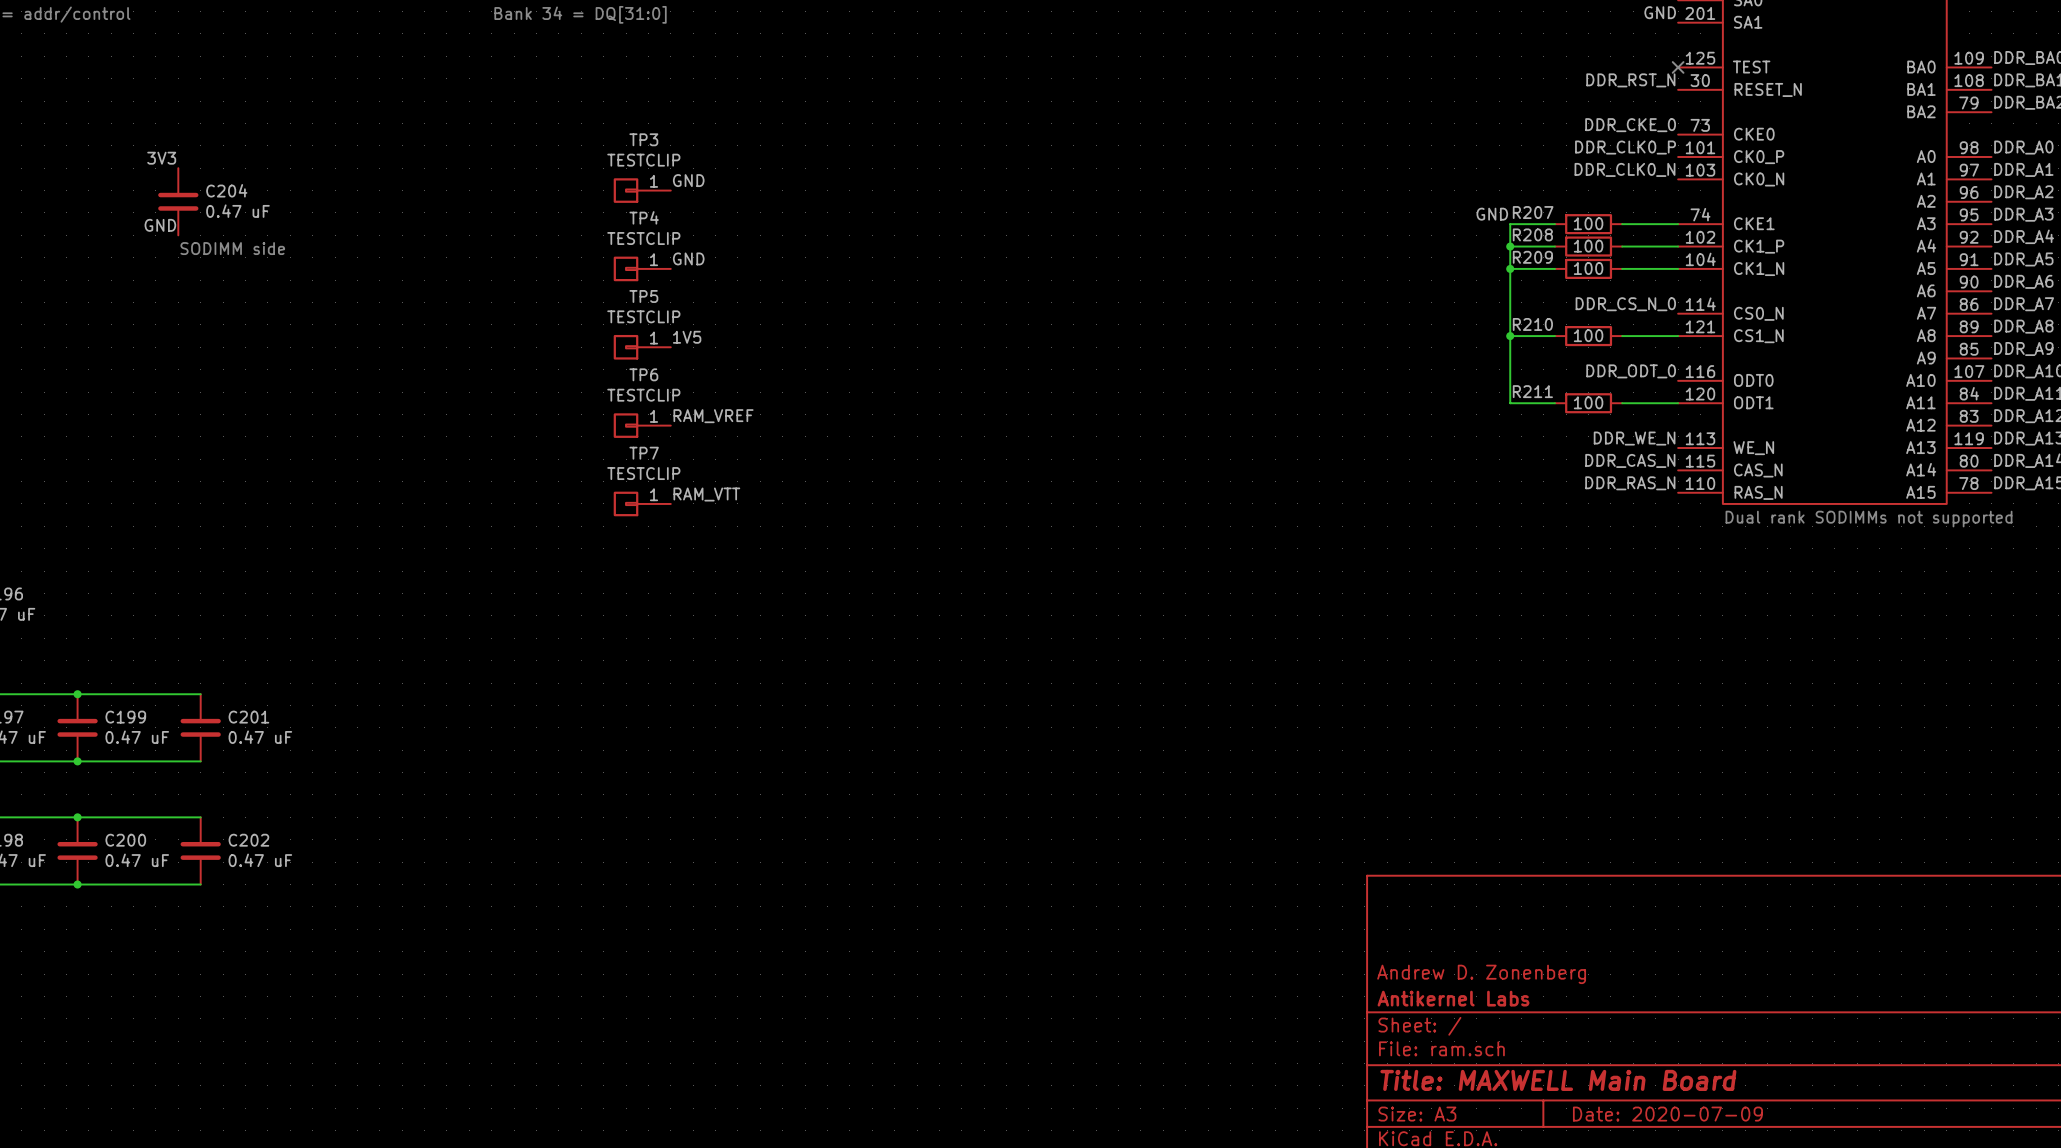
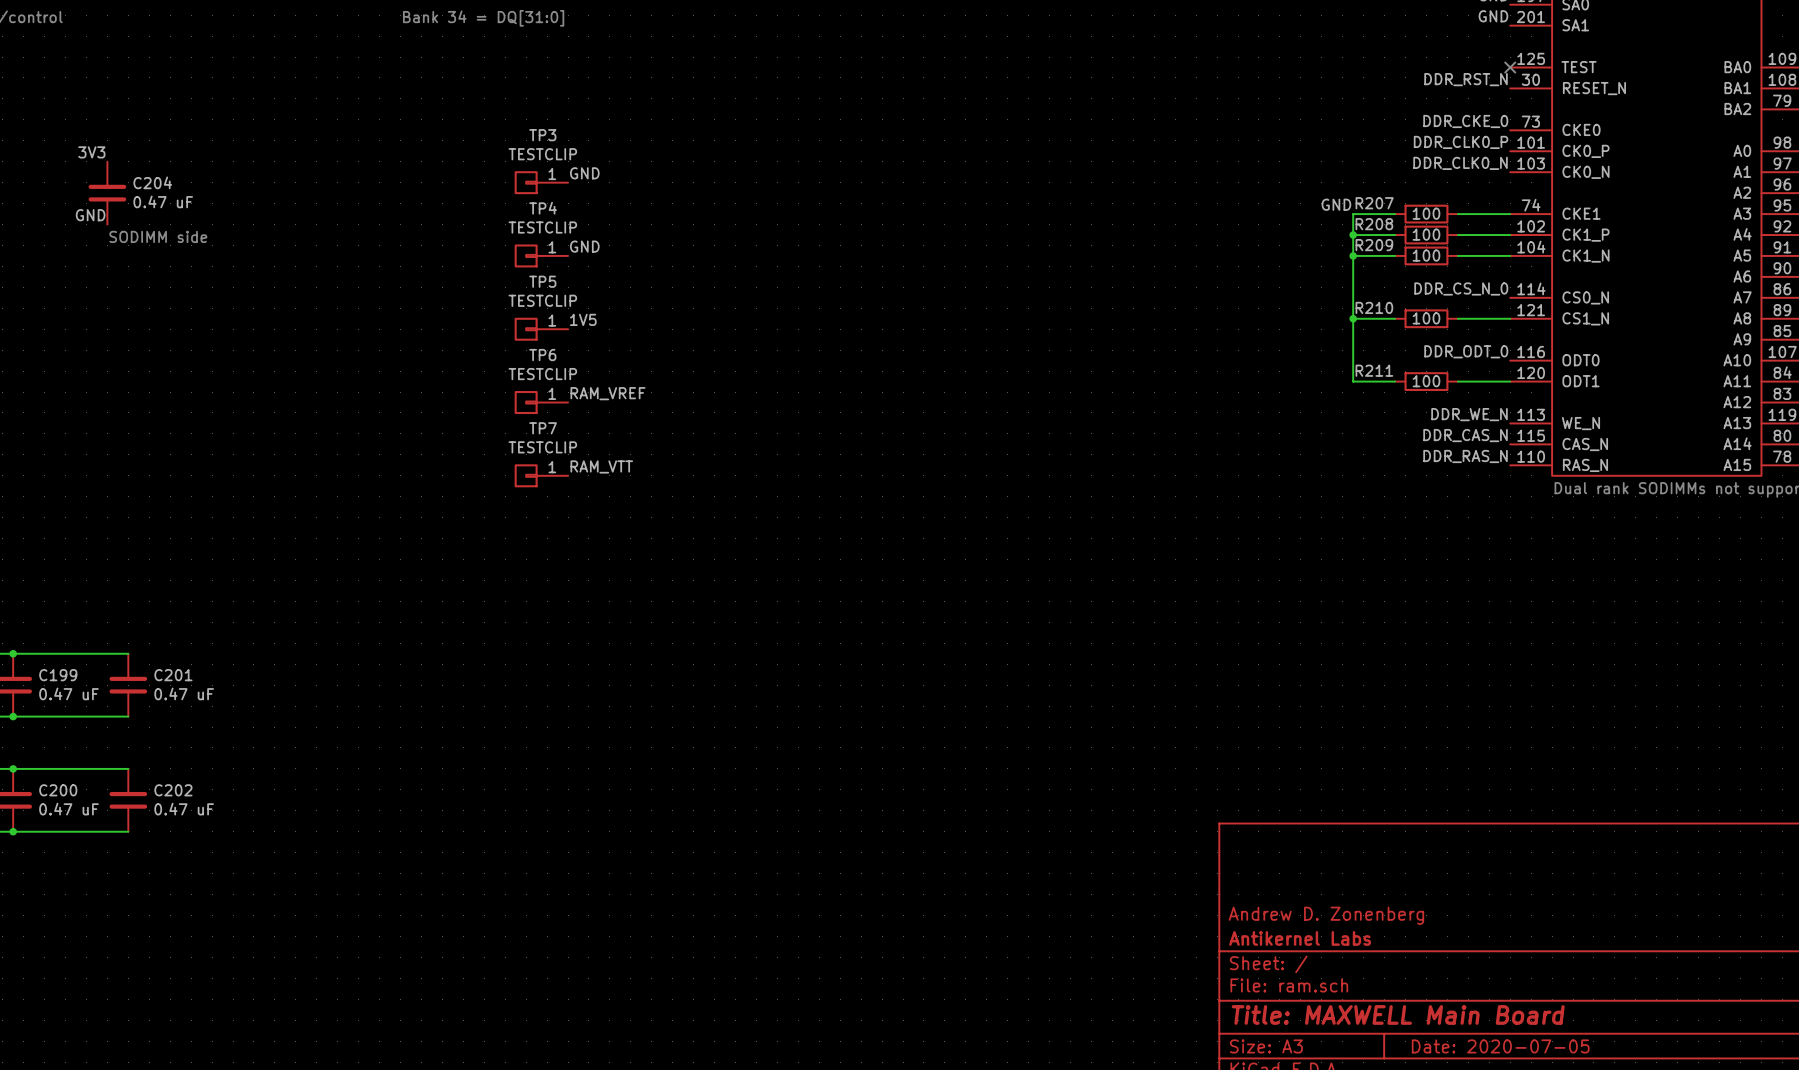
title block: Date: 2020-07-09 (1667, 1114) -> Date: 2020-07-05 (1500, 1046)

